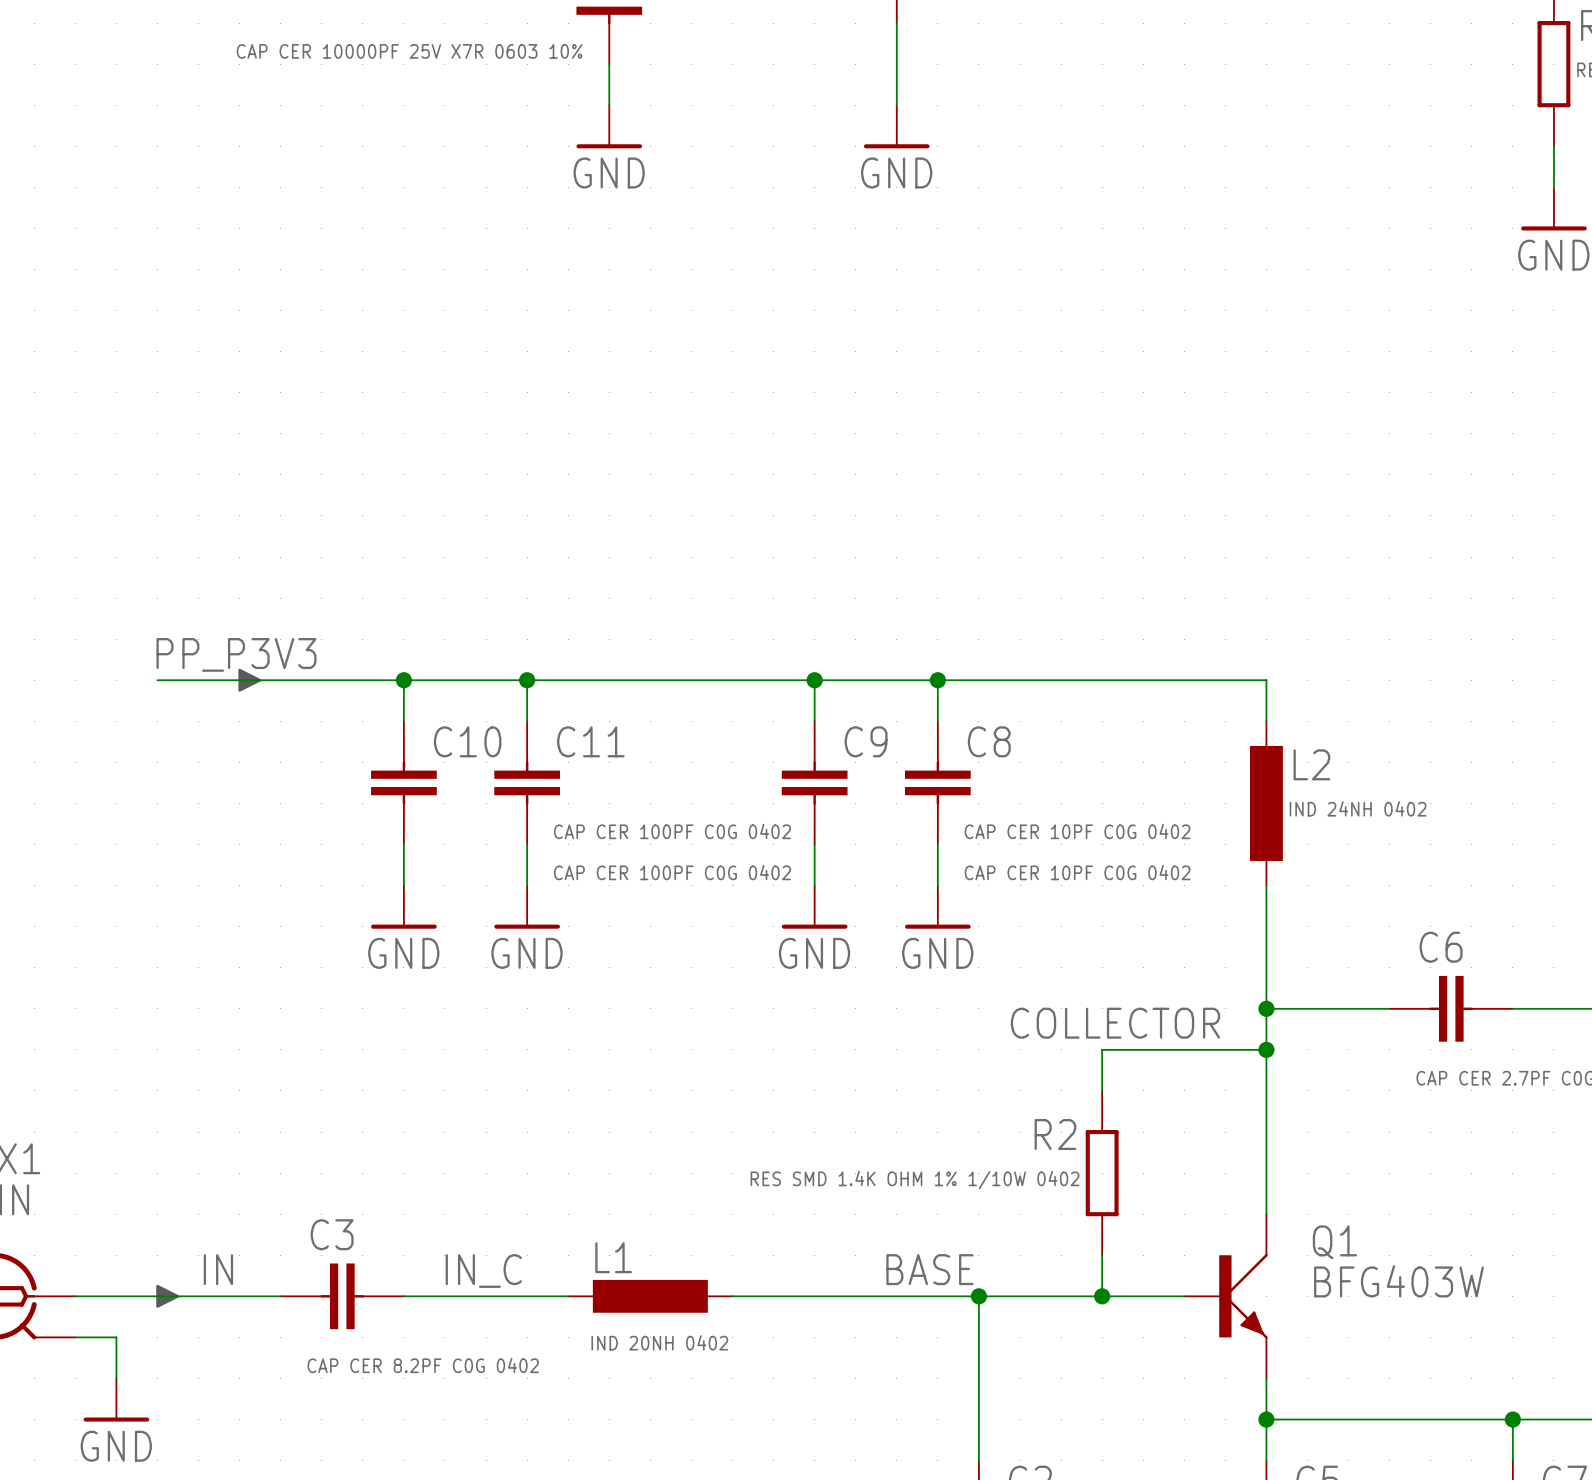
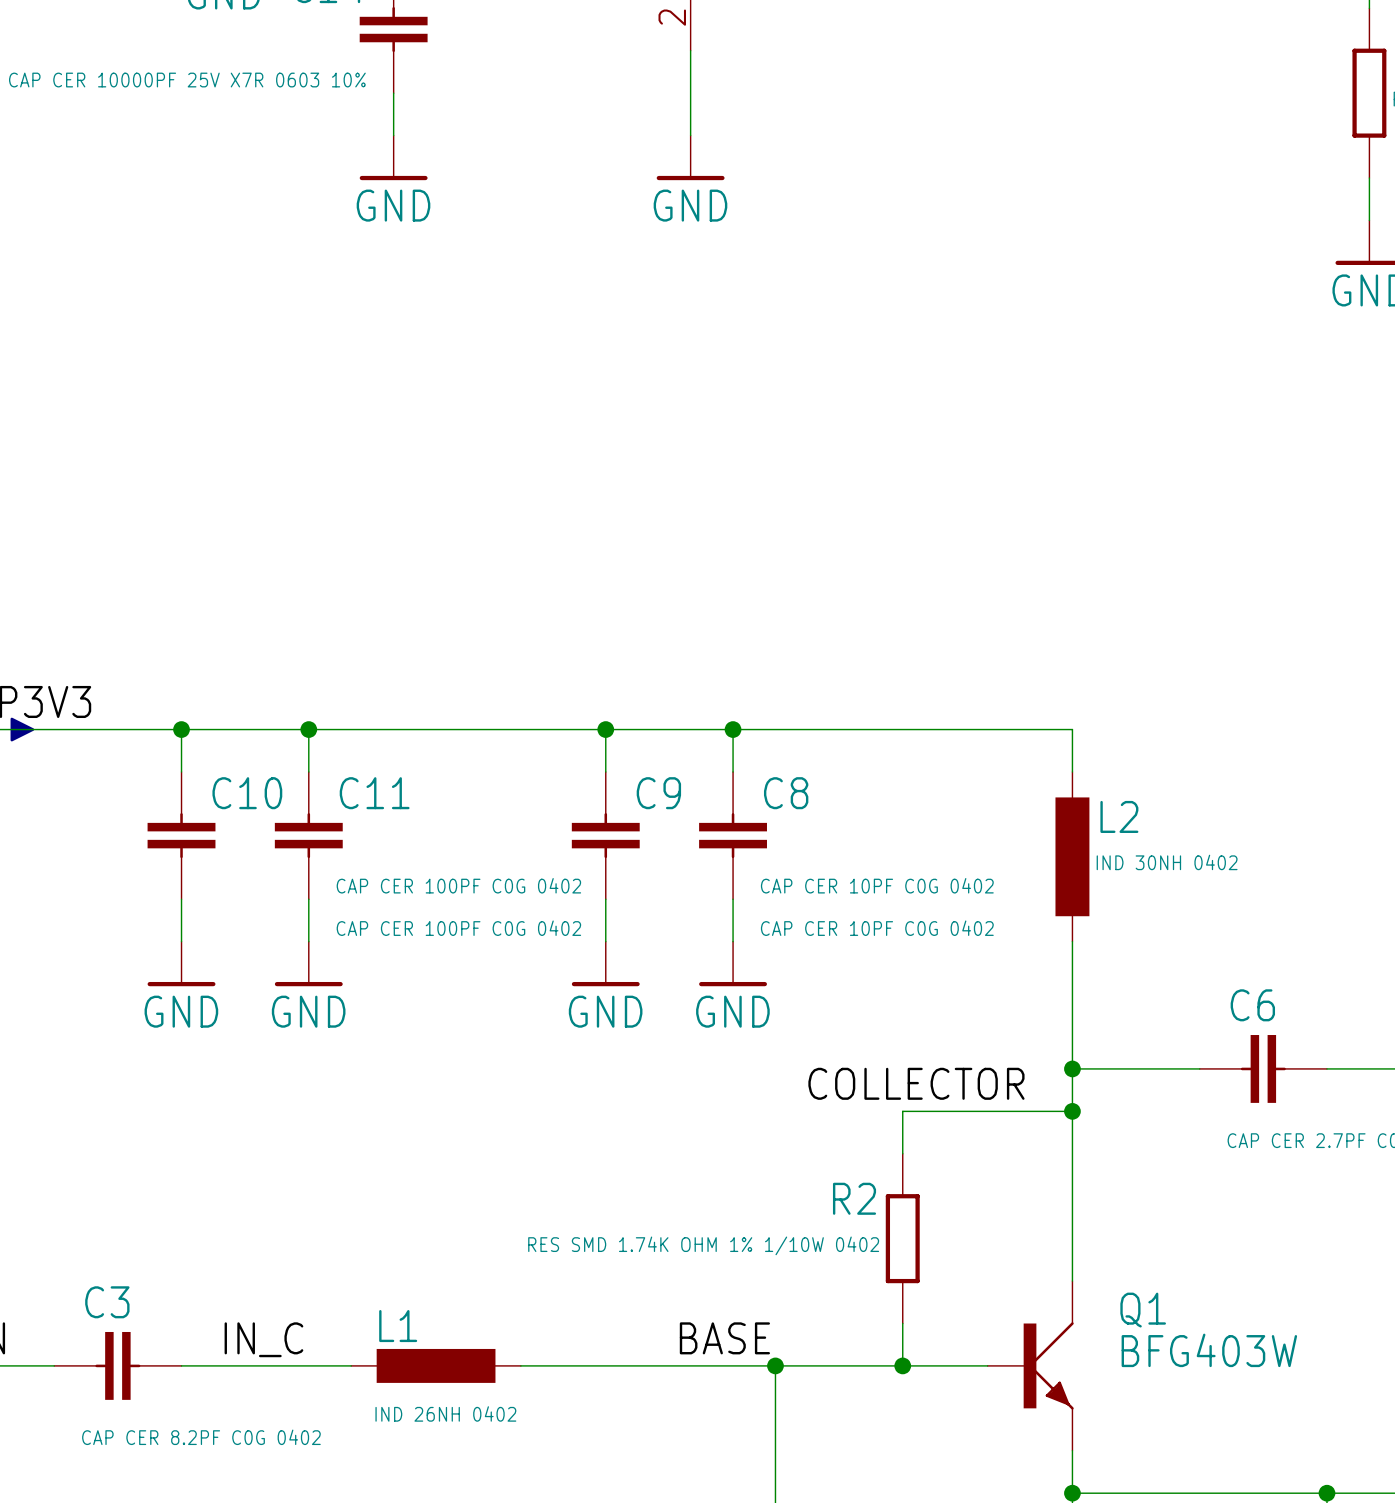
L2 value: IND 24NH 0402 (1358, 808) -> IND 30NH 0402 (1167, 862)
R2 value: RES SMD 1.4K OHM 1% 1/10W 0402 (915, 1180) -> RES SMD 1.74K OHM 1% 1/10W 0402 (703, 1245)
L1 value: IND 20NH 0402 (659, 1342) -> IND 26NH 0402 (445, 1413)

